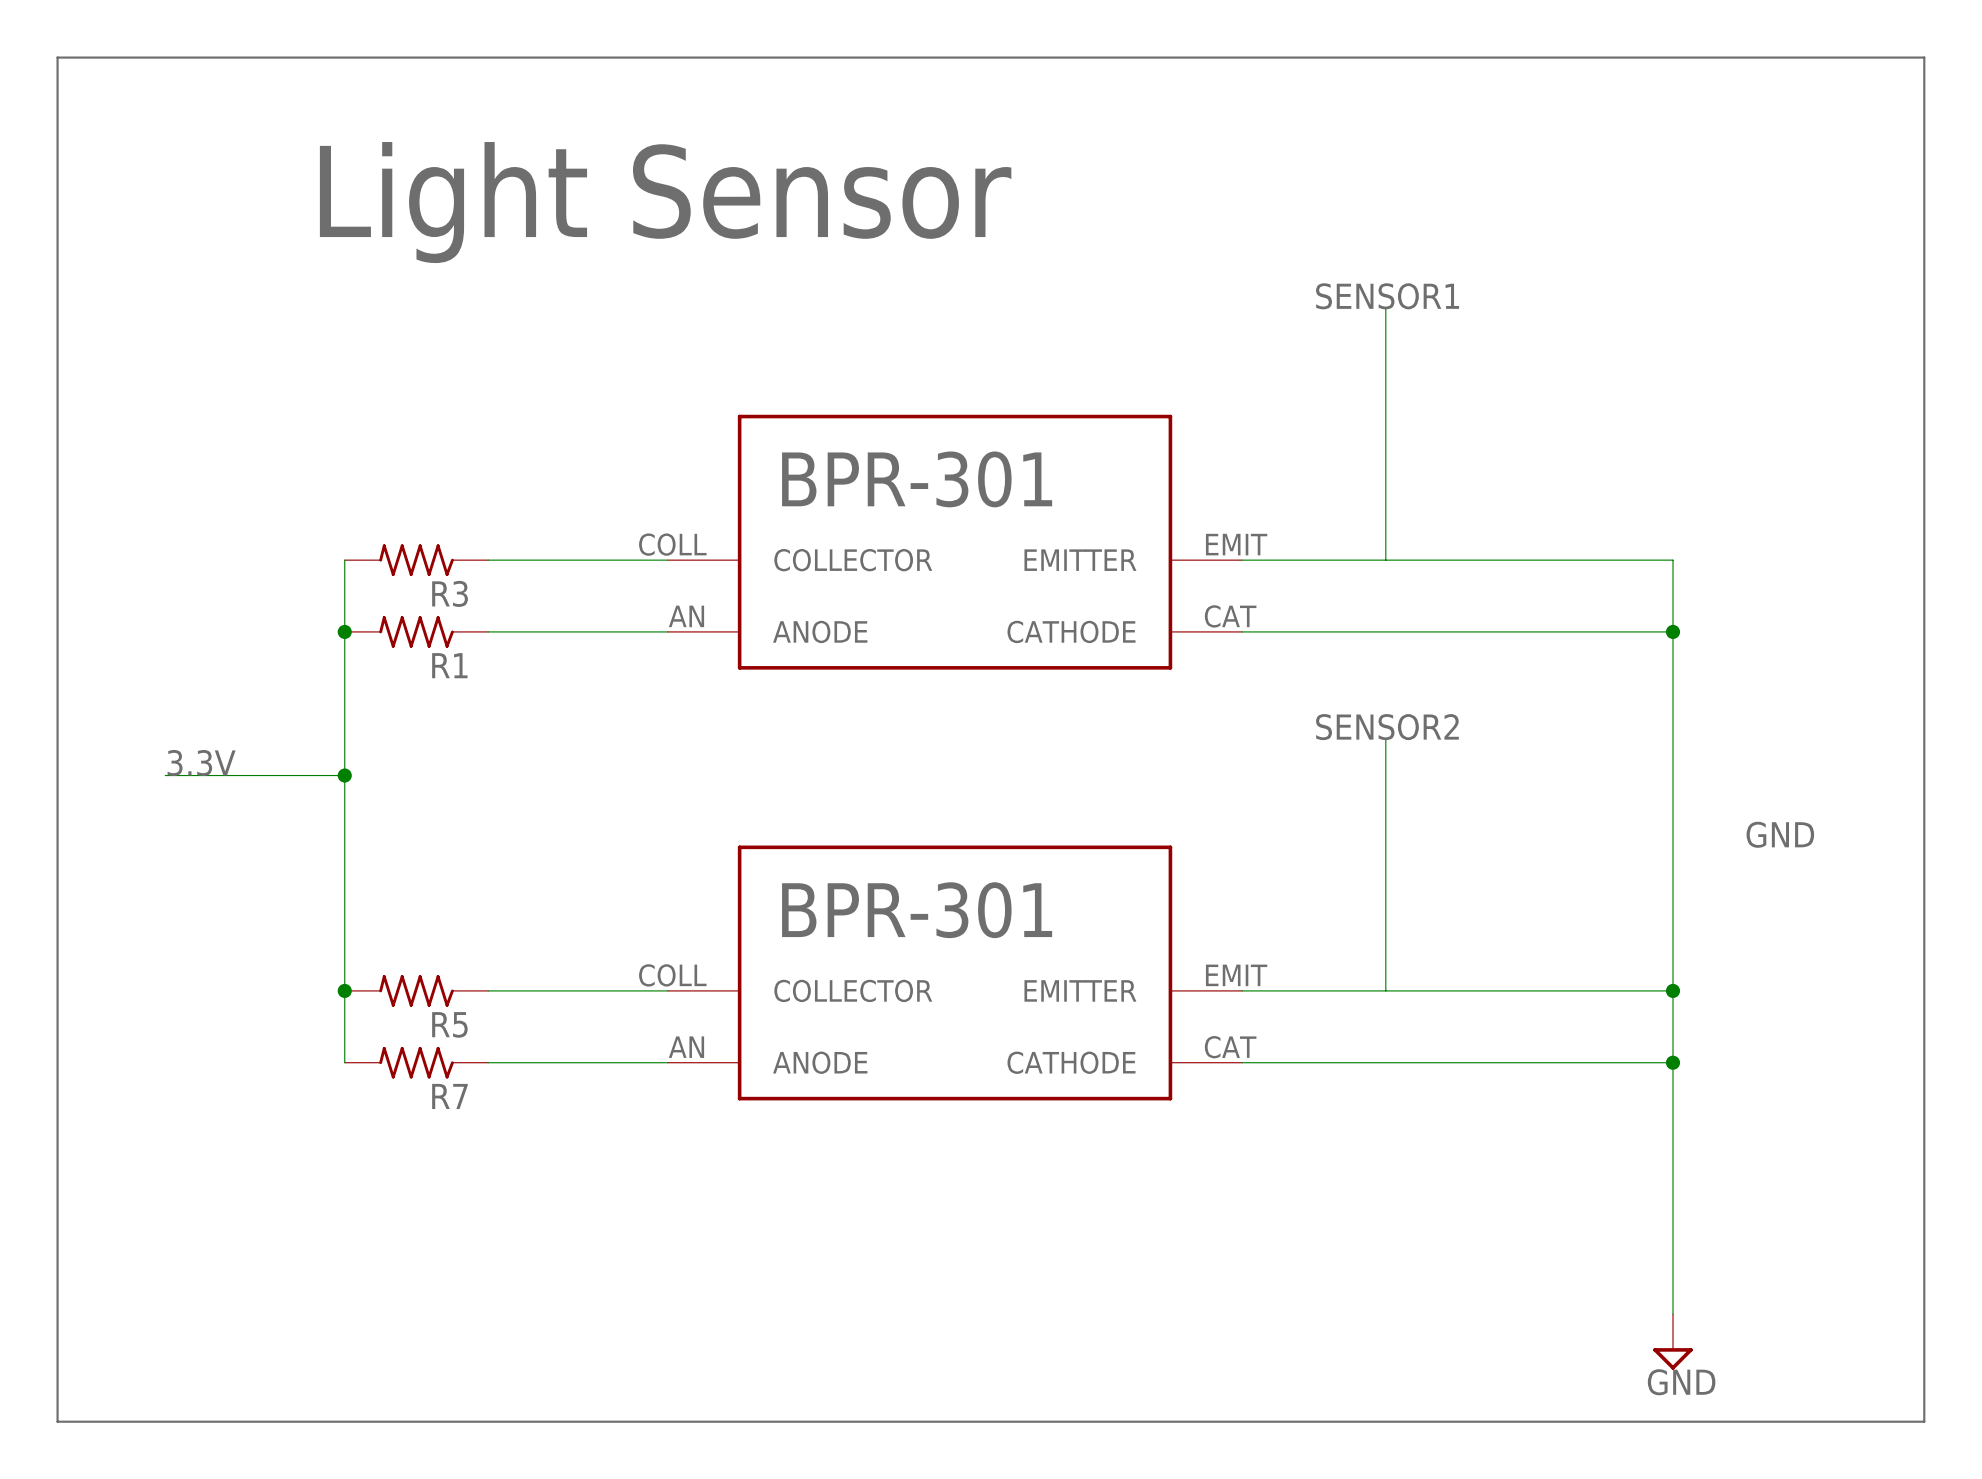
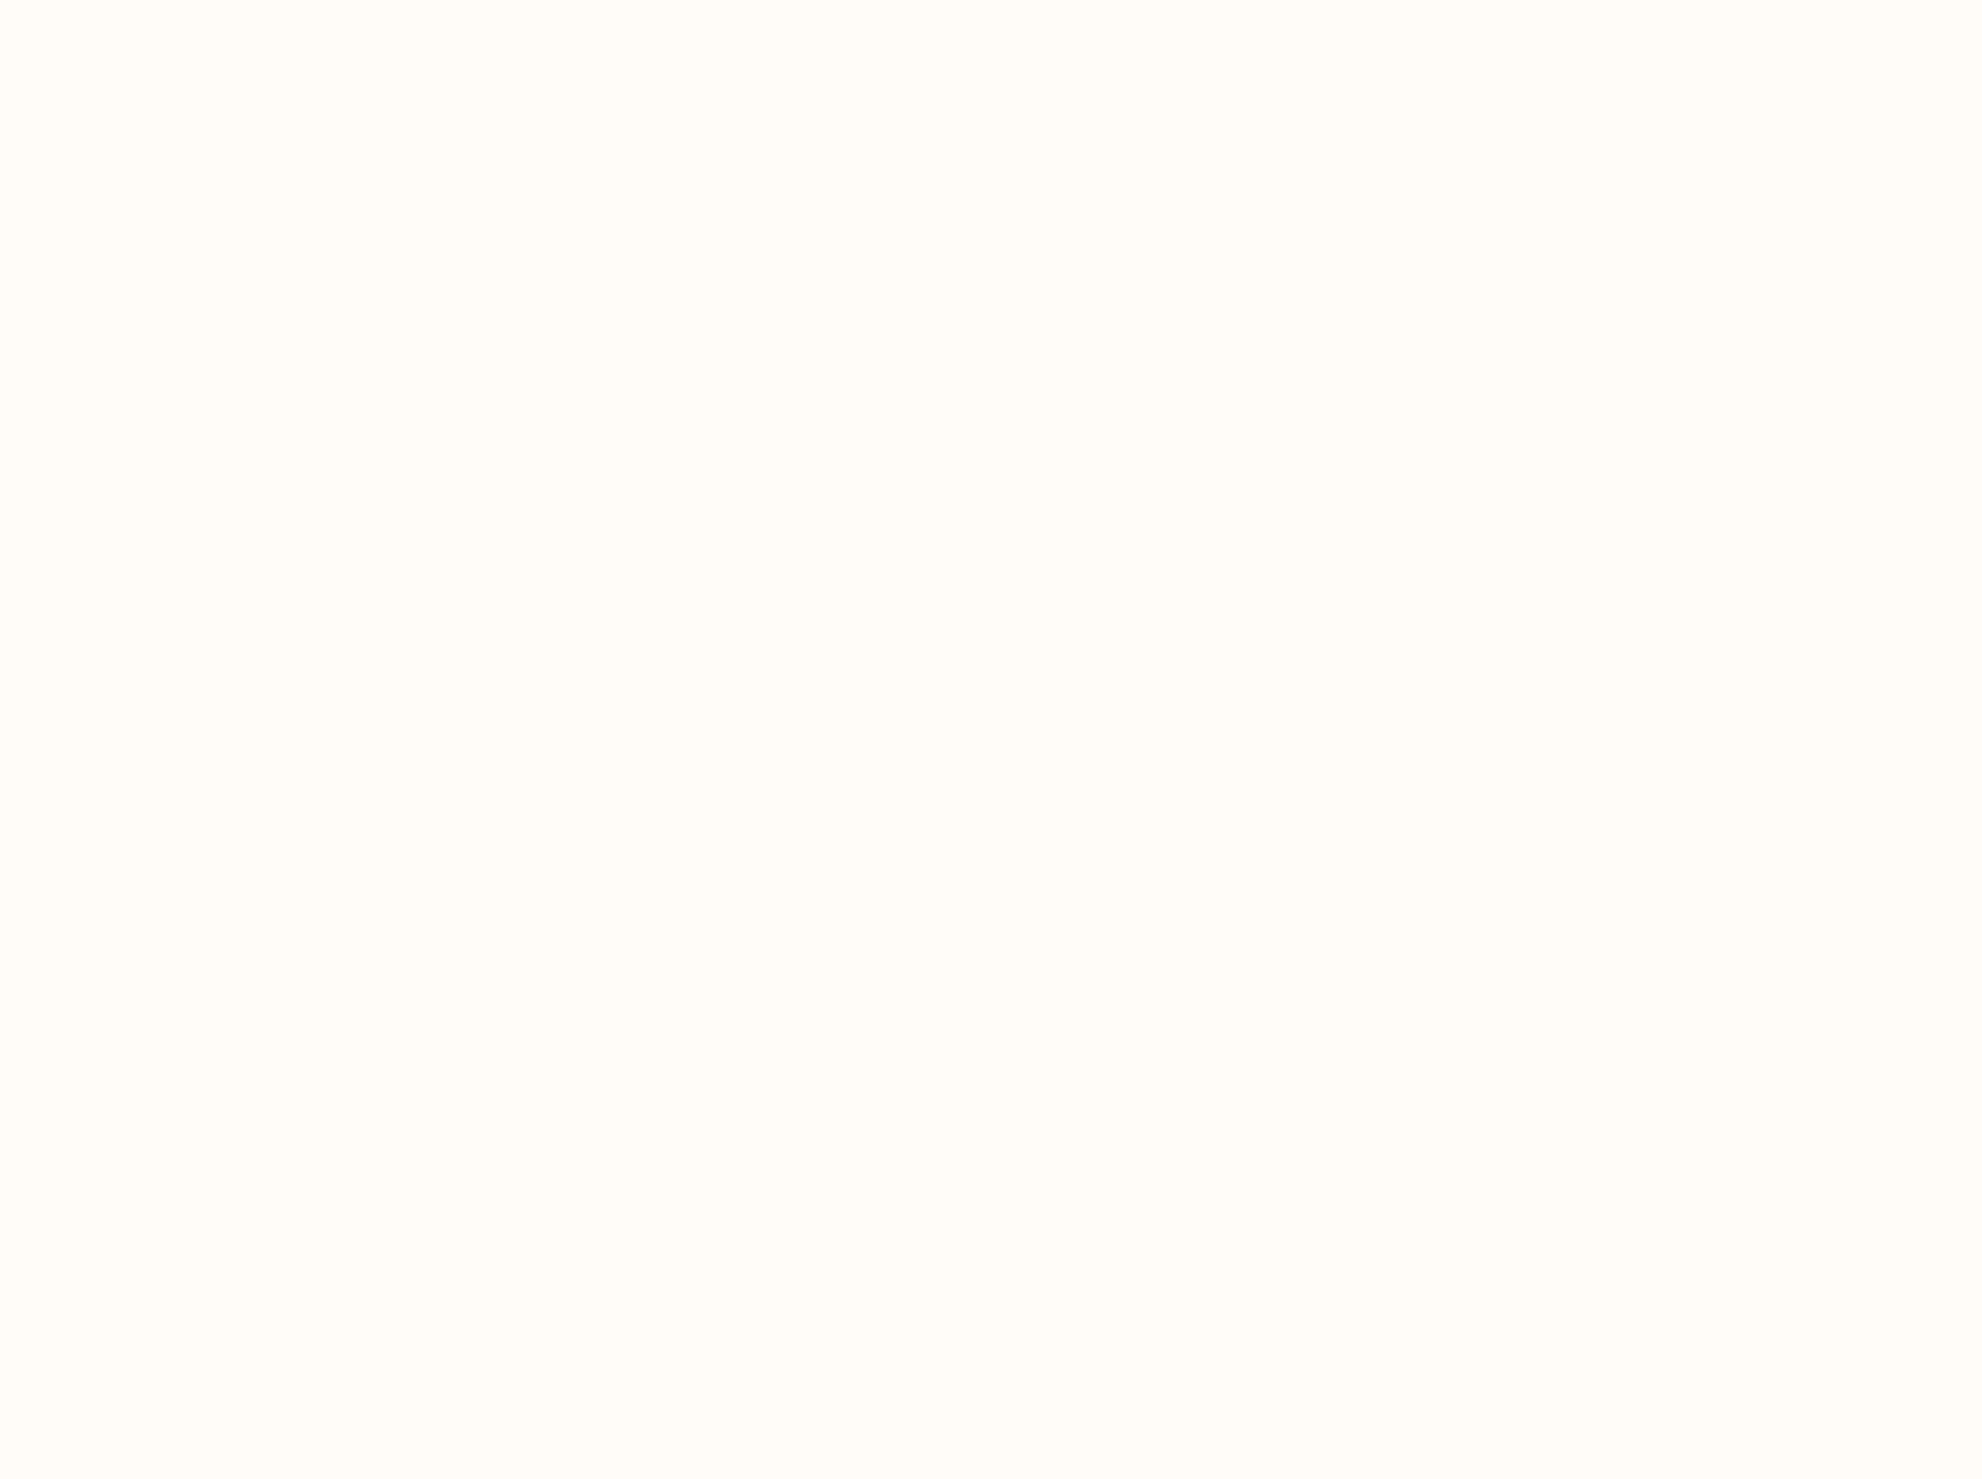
line: (57, 57) (57, 1421) (1924, 1421) (1924, 57) (57, 57) -> none
text: Light Sensor (665, 202) -> none
label: SENSOR1 (1387, 296) -> none
wire: (1385, 308) (1385, 560) -> none
part: (955, 542) -> none
wire: (344, 560) (344, 1062) -> none
R3: (416, 560) -> none
wire: (488, 560) (667, 560) -> none
wire: (1242, 560) (1673, 560) (1673, 1314) -> none
junction: (344, 631) -> none
R1: (416, 631) -> none
wire: (488, 631) (667, 631) -> none
wire: (1242, 631) (1673, 631) -> none
junction: (1673, 631) -> none
label: SENSOR2 (1387, 727) -> none
wire: (1385, 739) (1385, 990) -> none
label: 3.3V (201, 762) -> none
wire: (165, 775) (344, 775) -> none
junction: (344, 775) -> none
label: GND (1780, 834) -> none
part: (955, 972) -> none
junction: (344, 990) -> none
R5: (416, 990) -> none
wire: (488, 990) (667, 990) -> none
wire: (1242, 990) (1673, 990) -> none
junction: (1673, 990) -> none
R7: (416, 1062) -> none
wire: (488, 1062) (667, 1062) -> none
wire: (1242, 1062) (1673, 1062) -> none
junction: (1673, 1062) -> none
power symbol: GND (1673, 1341) -> none

